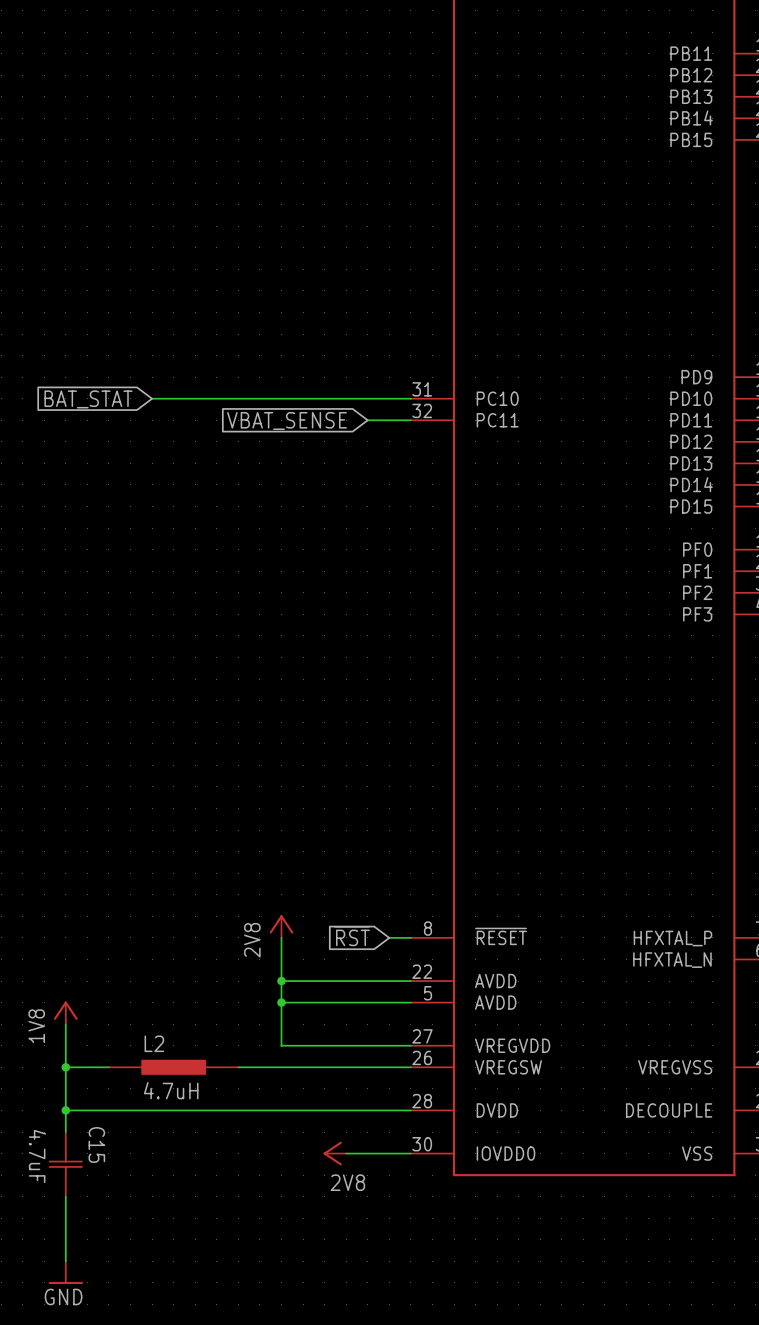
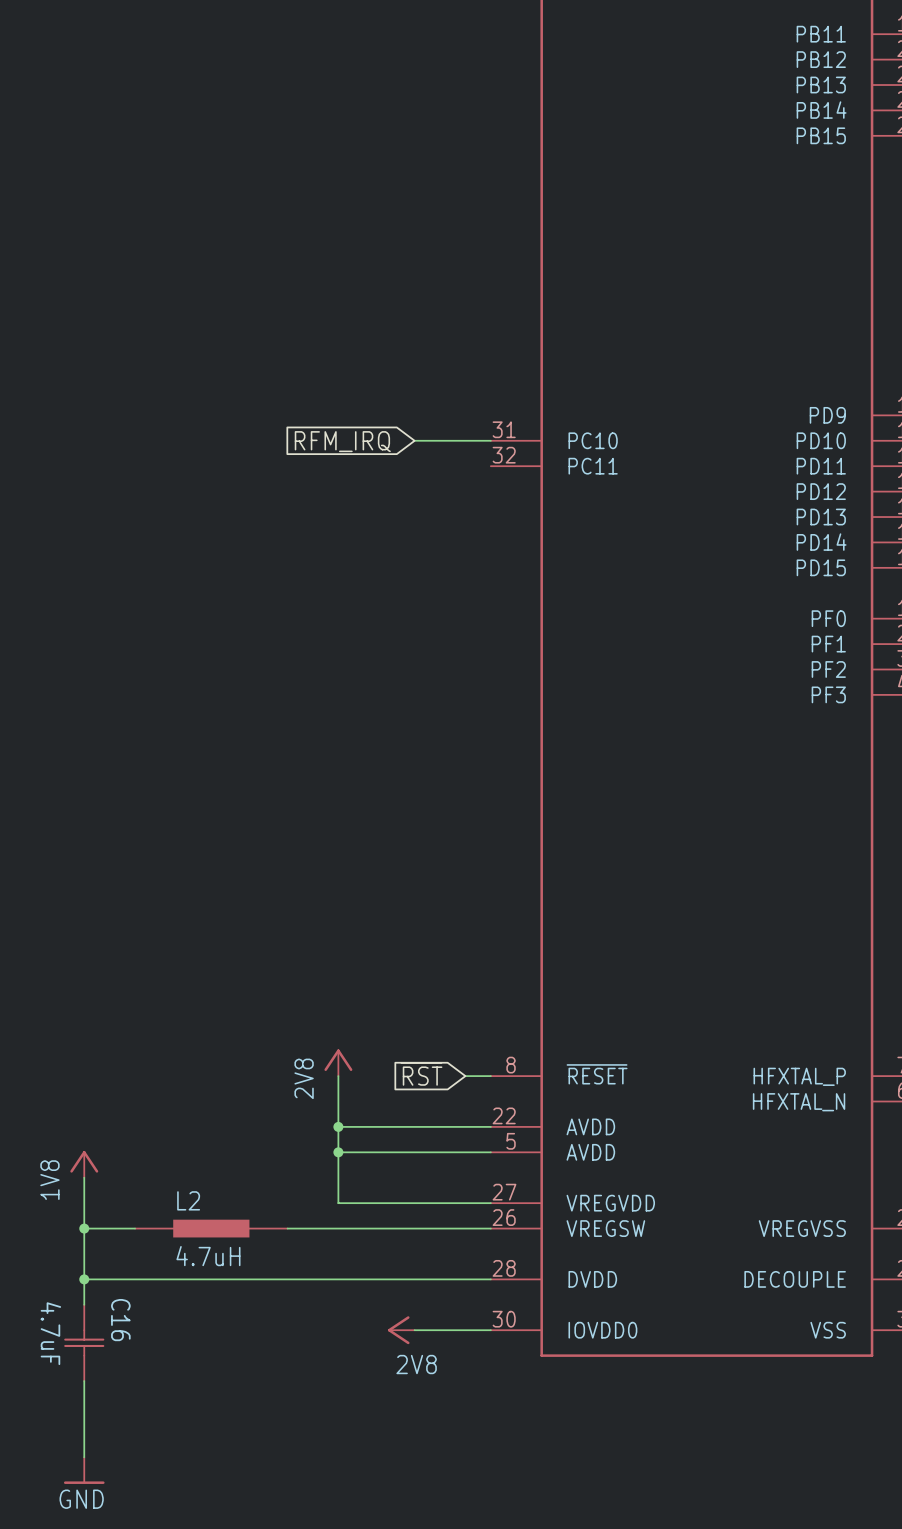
wire: (152, 398) (346, 398) -> none
global label: BAT_STAT (88, 399) -> none
global label: none -> RFM_IRQ (342, 441)
wire: (367, 420) (410, 420) -> none
global label: VBAT_SENSE (287, 421) -> none
C15 name: C15 (96, 1144) -> C16 (120, 1320)

